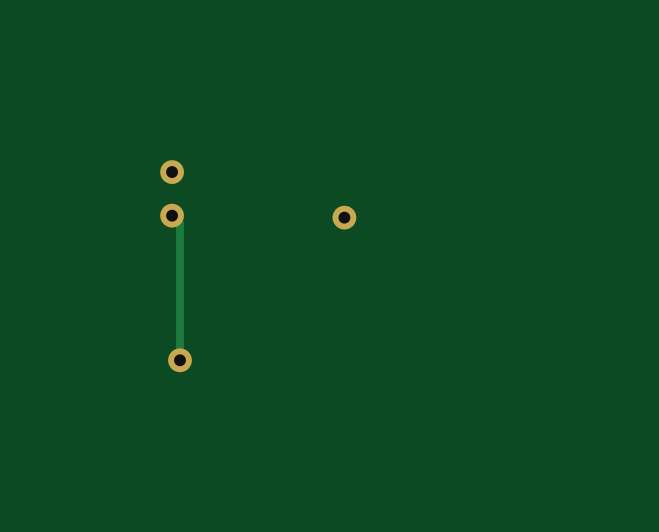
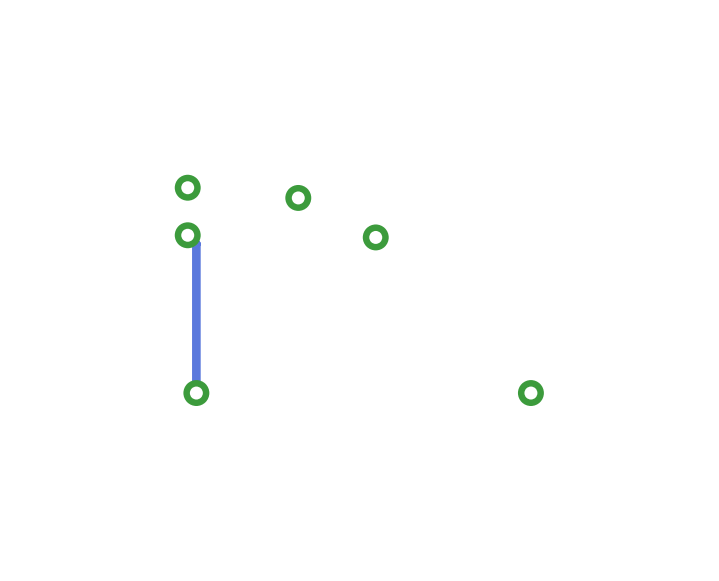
via: none -> (298, 197)
via: none -> (530, 393)

